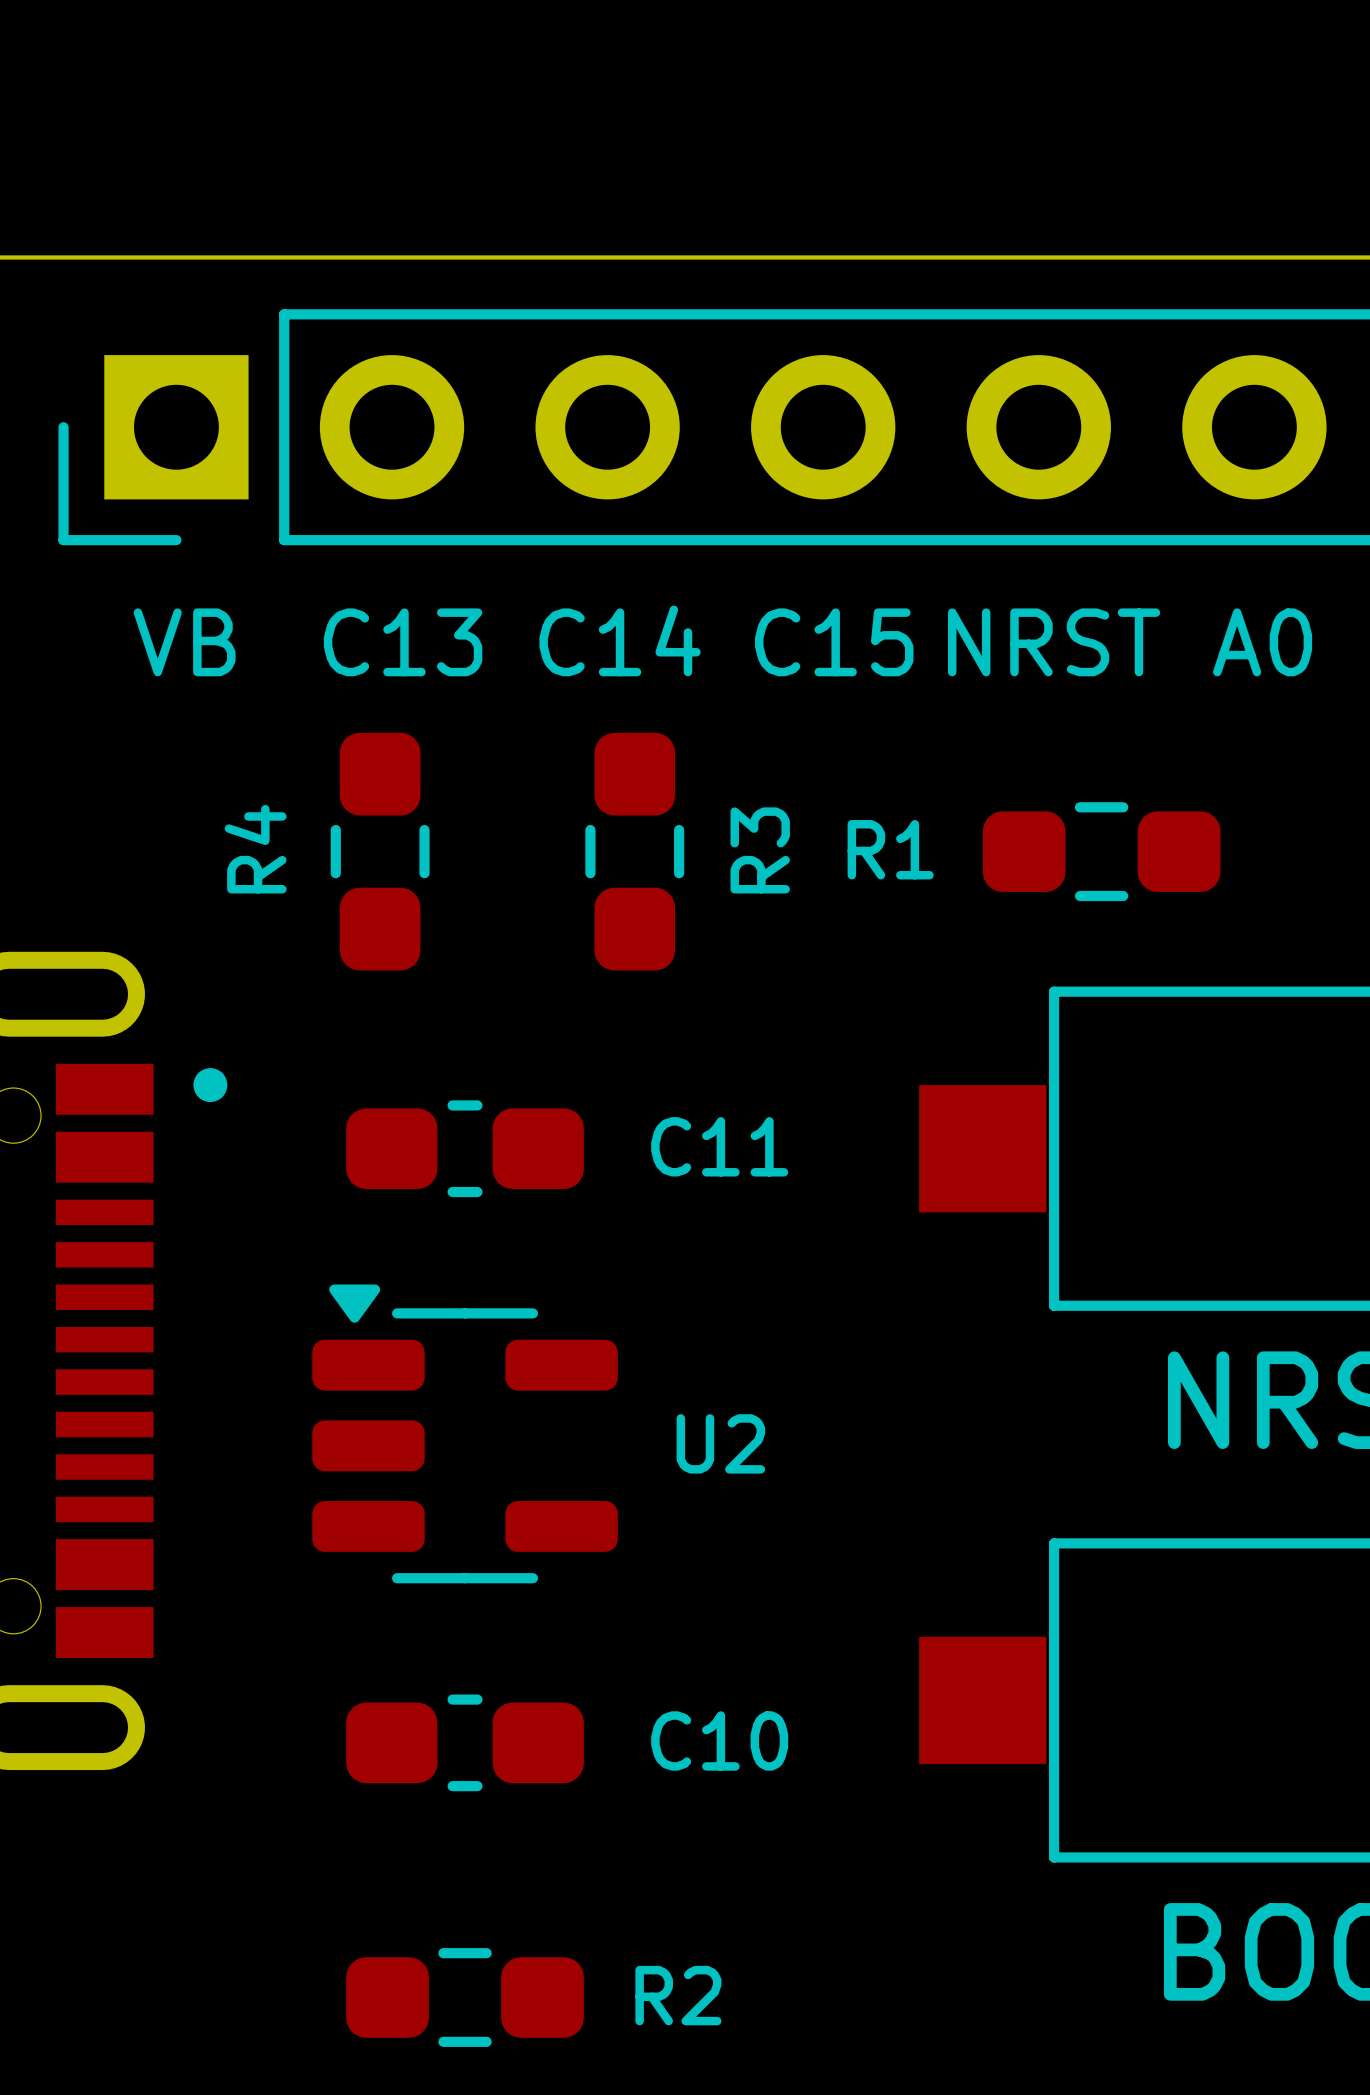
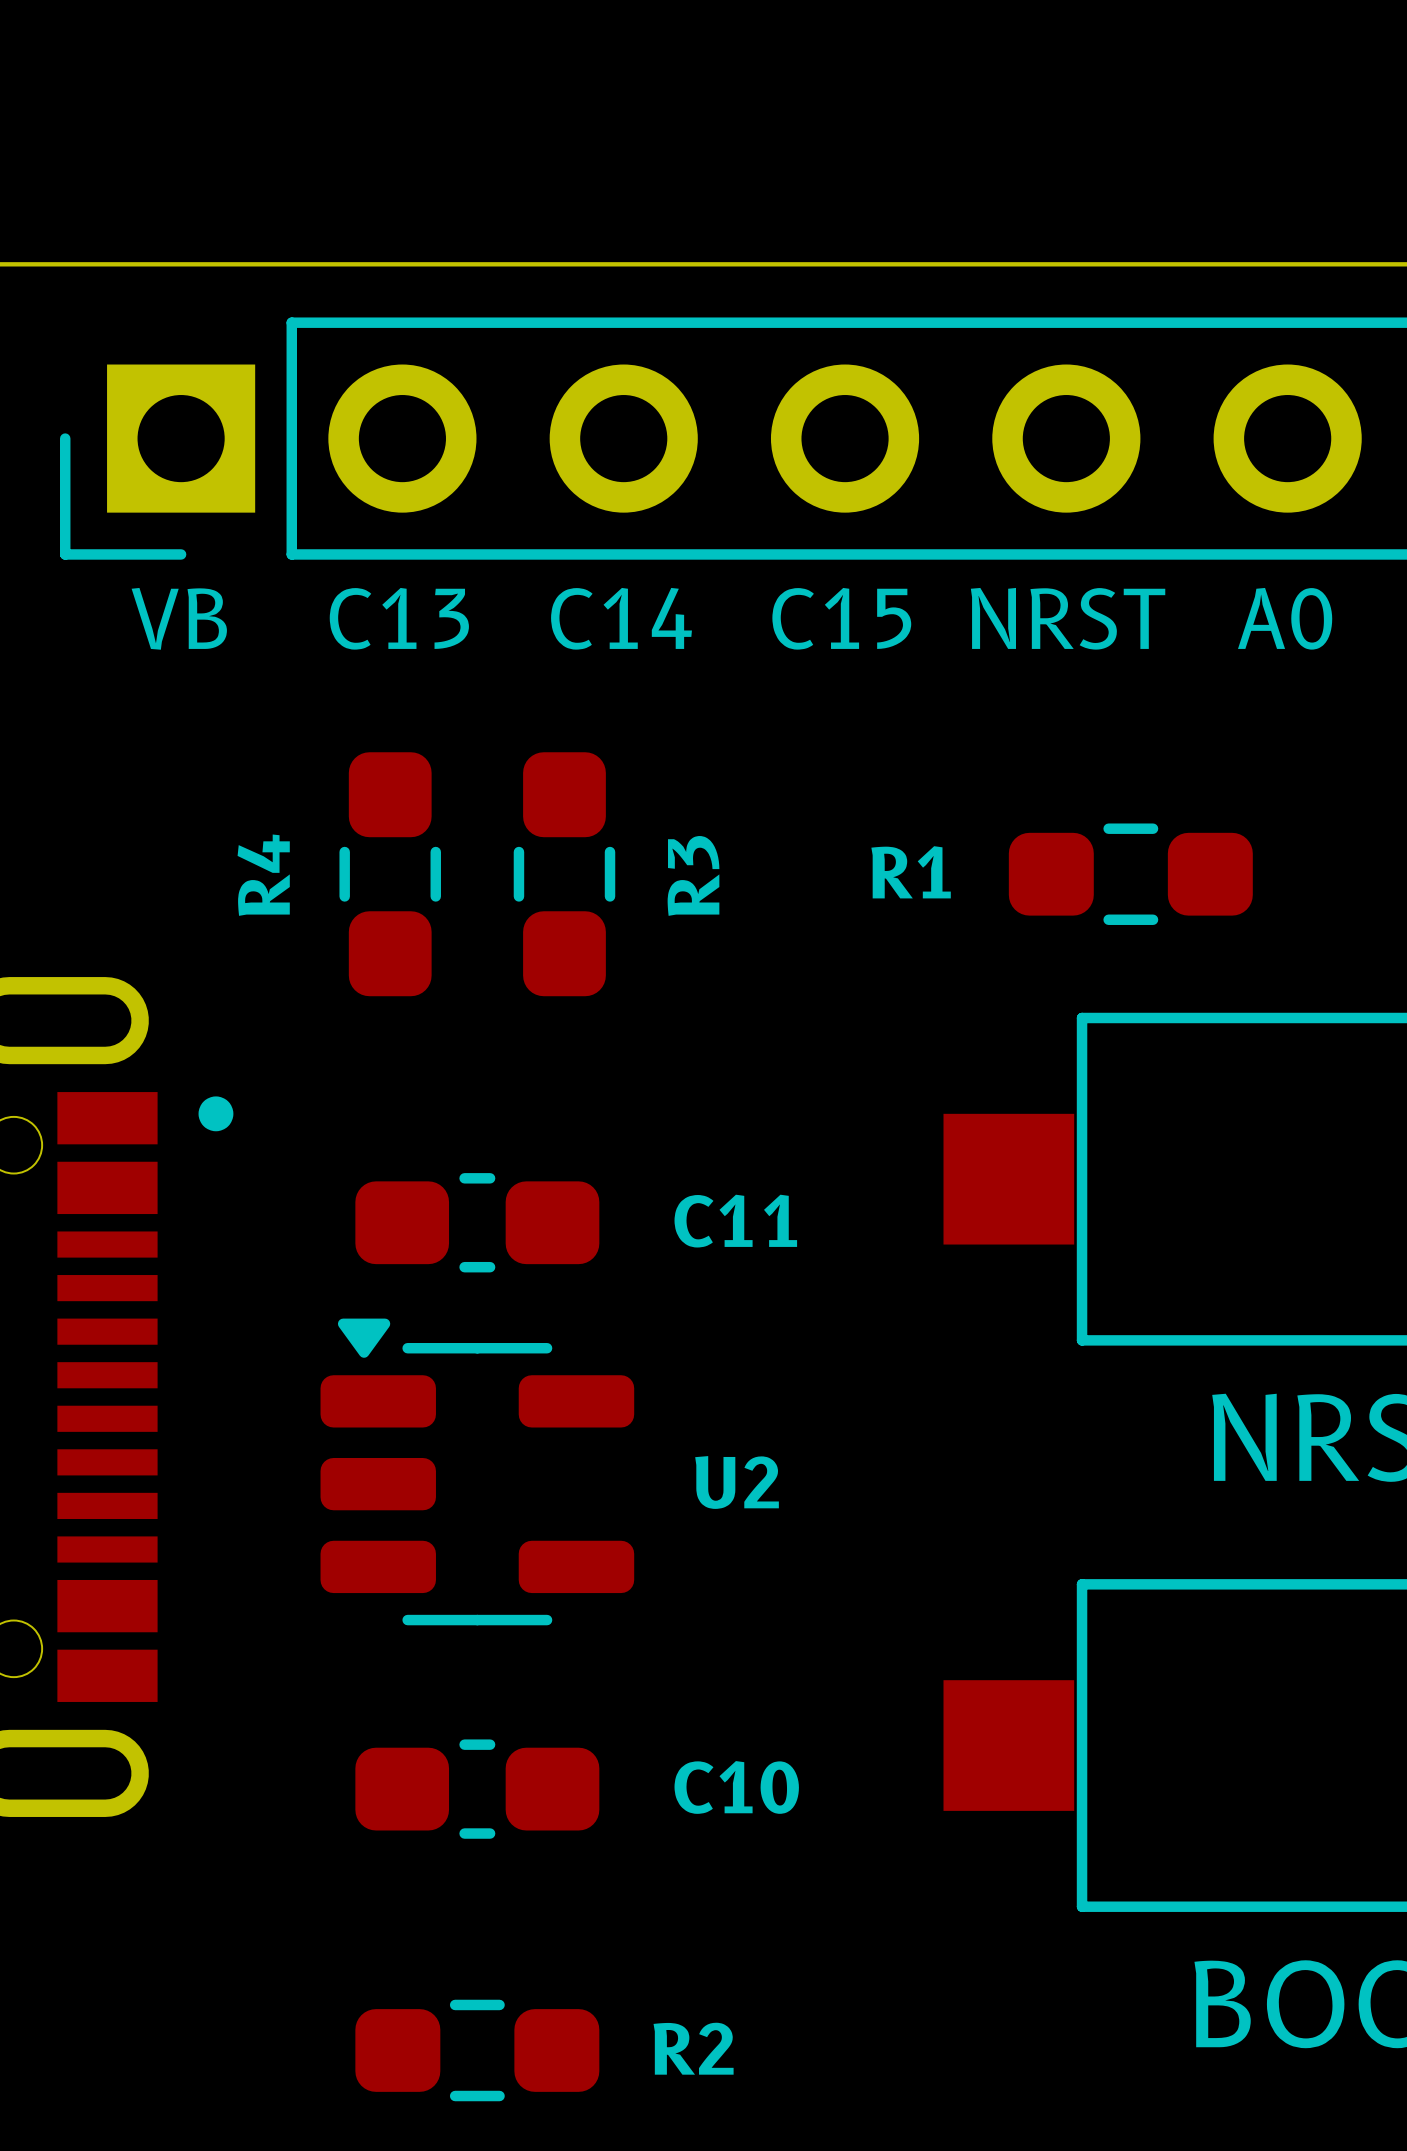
text position: C14 (620, 640) -> C14 (621, 618)
text position: VB (184, 642) -> VB (179, 618)
text position: C13 (403, 642) -> C13 (399, 618)
text position: C15 (834, 642) -> C15 (841, 618)
text position: NRST (1054, 642) -> NRST (1068, 618)
text position: A0 (1262, 642) -> A0 (1285, 618)
R3 position: (634, 851) -> (564, 874)
C11 position: (465, 1148) -> (477, 1222)

